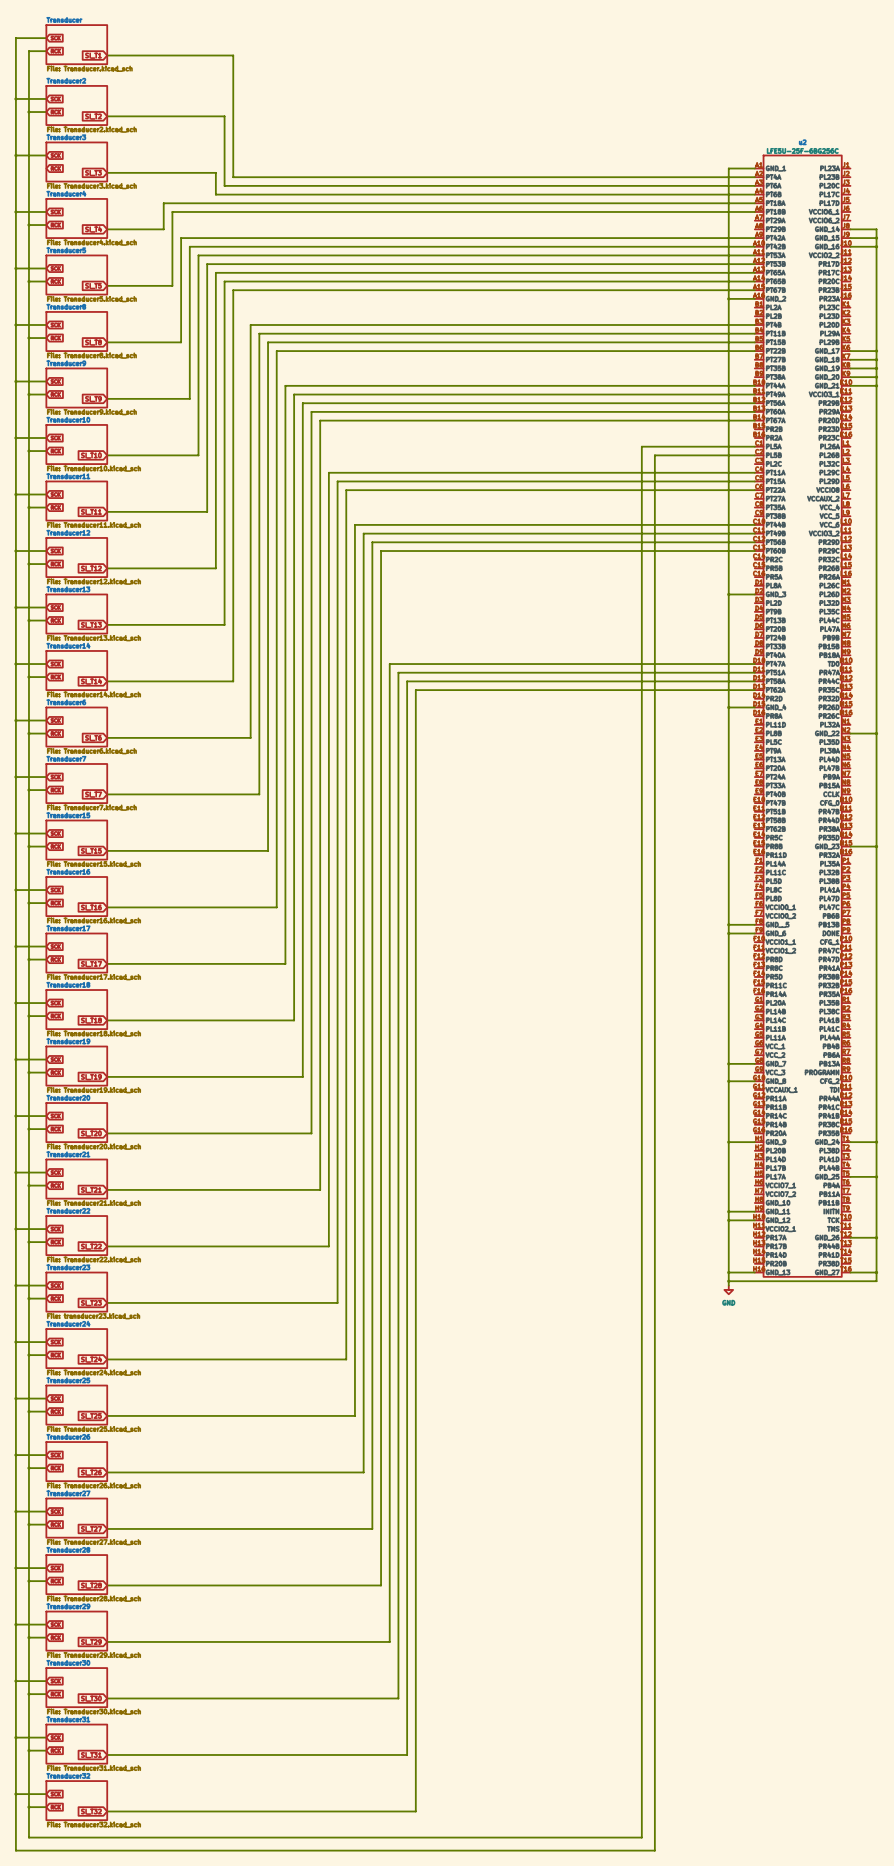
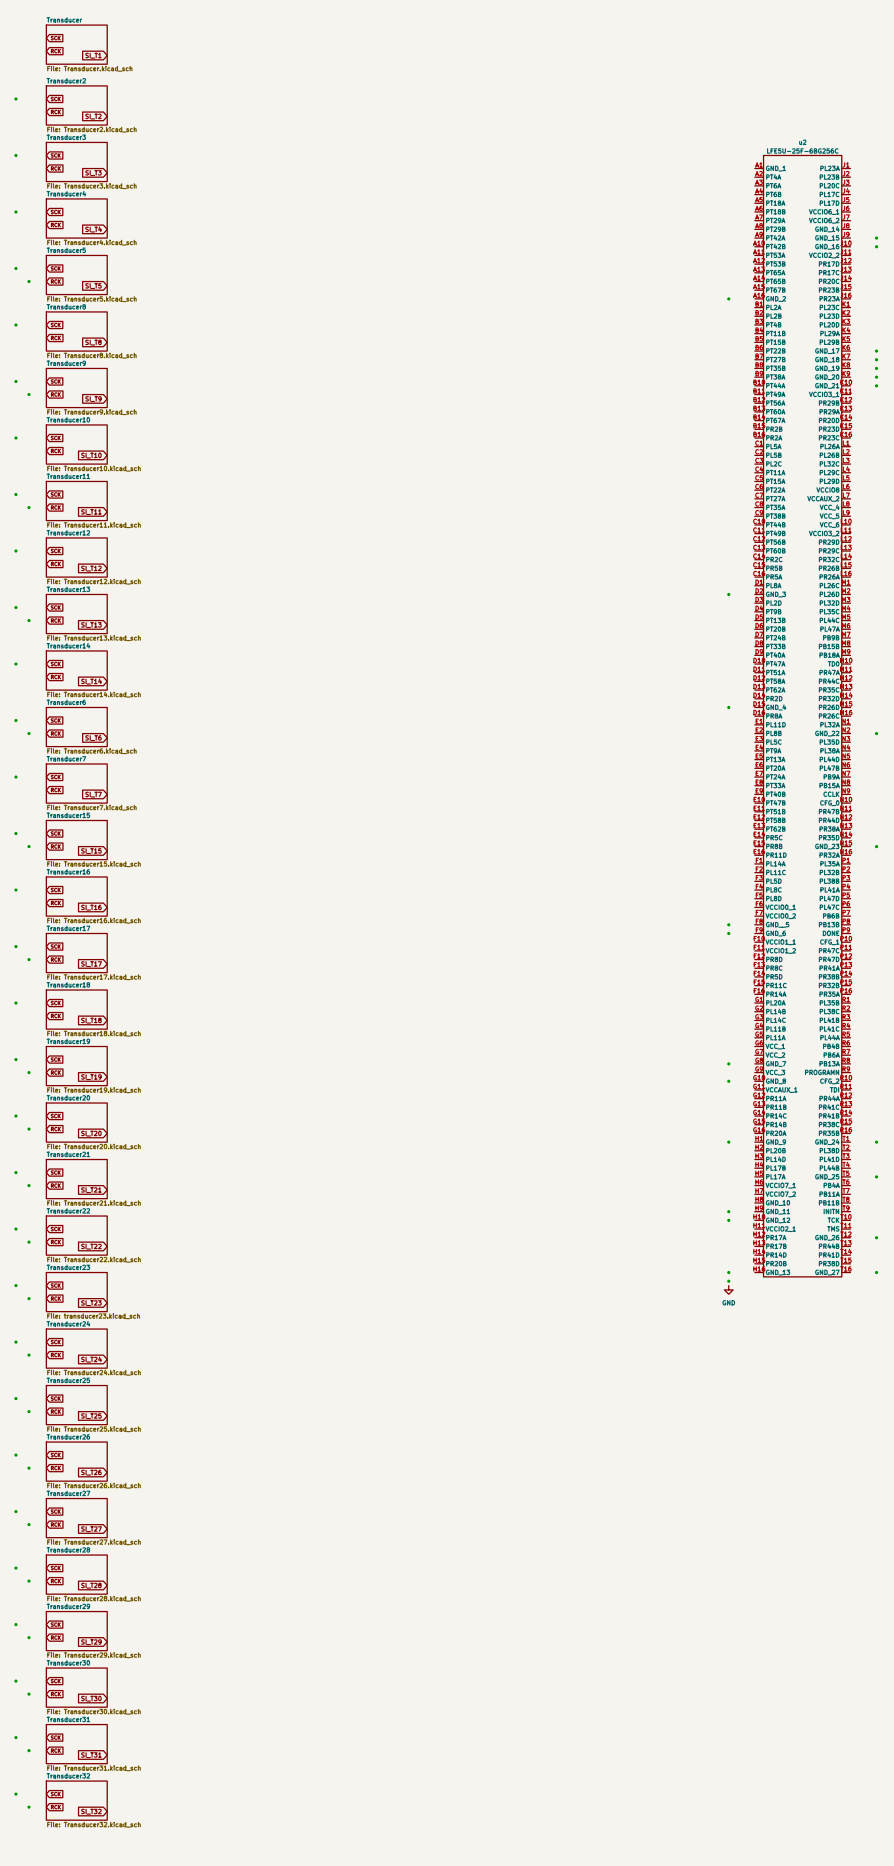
wire: (46, 38) (15, 38) (15, 1850) (654, 1850) (654, 455) (754, 455) -> none
wire: (46, 51) (28, 51) (28, 1837) (641, 1837) (641, 446) (754, 446) -> none
wire: (107, 55) (233, 55) (233, 177) (754, 177) -> none
wire: (15, 98) (46, 98) -> none
wire: (28, 112) (46, 112) -> none
wire: (107, 116) (224, 116) (224, 185) (754, 185) -> none
wire: (15, 155) (46, 155) -> none
wire: (754, 168) (728, 168) (728, 1285) -> none
wire: (107, 172) (215, 172) (215, 194) (754, 194) -> none
wire: (754, 203) (163, 203) (163, 229) (107, 229) -> none
wire: (15, 211) (46, 211) -> none
wire: (754, 211) (172, 211) (172, 285) (107, 285) -> none
wire: (28, 225) (46, 225) -> none
wire: (850, 229) (876, 229) (876, 1281) (728, 1281) -> none
wire: (754, 238) (181, 238) (181, 342) (107, 342) -> none
wire: (850, 238) (876, 238) -> none
wire: (754, 246) (189, 246) (189, 398) (107, 398) -> none
wire: (850, 246) (876, 246) -> none
wire: (754, 255) (198, 255) (198, 455) (107, 455) -> none
wire: (754, 264) (207, 264) (207, 511) (107, 511) -> none
wire: (15, 268) (46, 268) -> none
wire: (754, 272) (215, 272) (215, 568) (107, 568) -> none
wire: (28, 281) (46, 281) -> none
wire: (754, 281) (224, 281) (224, 624) (107, 624) -> none
wire: (754, 290) (233, 290) (233, 681) (107, 681) -> none
wire: (728, 298) (754, 298) -> none
wire: (15, 324) (46, 324) -> none
wire: (754, 324) (250, 324) (250, 737) (107, 737) -> none
wire: (754, 333) (259, 333) (259, 794) (107, 794) -> none
wire: (28, 338) (46, 338) -> none
wire: (754, 342) (268, 342) (268, 850) (107, 850) -> none
wire: (754, 351) (276, 351) (276, 907) (107, 907) -> none
wire: (850, 351) (876, 351) -> none
wire: (850, 359) (876, 359) -> none
wire: (850, 368) (876, 368) -> none
wire: (850, 377) (876, 377) -> none
wire: (15, 381) (46, 381) -> none
wire: (754, 385) (285, 385) (285, 963) (107, 963) -> none
wire: (850, 385) (876, 385) -> none
wire: (28, 394) (46, 394) -> none
wire: (754, 394) (294, 394) (294, 1020) (107, 1020) -> none
wire: (754, 403) (302, 403) (302, 1076) (107, 1076) -> none
wire: (754, 411) (311, 411) (311, 1133) (107, 1133) -> none
wire: (754, 420) (320, 420) (320, 1189) (107, 1189) -> none
wire: (15, 438) (46, 438) -> none
wire: (28, 451) (46, 451) -> none
wire: (754, 472) (328, 472) (328, 1246) (107, 1246) -> none
wire: (754, 481) (337, 481) (337, 1302) (107, 1302) -> none
wire: (754, 490) (346, 490) (346, 1359) (107, 1359) -> none
wire: (15, 494) (46, 494) -> none
wire: (28, 507) (46, 507) -> none
wire: (754, 524) (354, 524) (354, 1415) (107, 1415) -> none
wire: (754, 533) (363, 533) (363, 1472) (107, 1472) -> none
wire: (754, 542) (372, 542) (372, 1528) (107, 1528) -> none
wire: (15, 551) (46, 551) -> none
wire: (754, 551) (381, 551) (381, 1585) (107, 1585) -> none
wire: (28, 564) (46, 564) -> none
wire: (728, 594) (754, 594) -> none
wire: (15, 607) (46, 607) -> none
wire: (28, 620) (46, 620) -> none
wire: (15, 664) (46, 664) -> none
wire: (754, 664) (389, 664) (389, 1641) (107, 1641) -> none
wire: (754, 672) (398, 672) (398, 1698) (107, 1698) -> none
wire: (28, 677) (46, 677) -> none
wire: (754, 681) (407, 681) (407, 1754) (107, 1754) -> none
wire: (754, 690) (415, 690) (415, 1811) (107, 1811) -> none
wire: (728, 707) (754, 707) -> none
wire: (15, 720) (46, 720) -> none
wire: (28, 733) (46, 733) -> none
wire: (850, 733) (876, 733) -> none
wire: (15, 777) (46, 777) -> none
wire: (28, 790) (46, 790) -> none
wire: (15, 833) (46, 833) -> none
wire: (28, 846) (46, 846) -> none
wire: (850, 846) (876, 846) -> none
wire: (15, 890) (46, 890) -> none
wire: (28, 903) (46, 903) -> none
wire: (728, 924) (754, 924) -> none
wire: (728, 933) (754, 933) -> none
wire: (15, 946) (46, 946) -> none
wire: (28, 959) (46, 959) -> none
wire: (15, 1003) (46, 1003) -> none
wire: (28, 1016) (46, 1016) -> none
wire: (15, 1059) (46, 1059) -> none
wire: (728, 1063) (754, 1063) -> none
wire: (28, 1072) (46, 1072) -> none
wire: (728, 1081) (754, 1081) -> none
wire: (15, 1116) (46, 1116) -> none
wire: (28, 1129) (46, 1129) -> none
wire: (728, 1142) (754, 1142) -> none
wire: (850, 1142) (876, 1142) -> none
wire: (15, 1172) (46, 1172) -> none
wire: (850, 1176) (876, 1176) -> none
wire: (28, 1185) (46, 1185) -> none
wire: (728, 1211) (754, 1211) -> none
wire: (728, 1220) (754, 1220) -> none
wire: (15, 1229) (46, 1229) -> none
wire: (850, 1237) (876, 1237) -> none
wire: (28, 1242) (46, 1242) -> none
wire: (728, 1272) (754, 1272) -> none
wire: (850, 1272) (876, 1272) -> none
wire: (15, 1285) (46, 1285) -> none
wire: (28, 1298) (46, 1298) -> none
wire: (15, 1342) (46, 1342) -> none
wire: (28, 1355) (46, 1355) -> none
wire: (15, 1398) (46, 1398) -> none
wire: (28, 1411) (46, 1411) -> none
wire: (15, 1455) (46, 1455) -> none
wire: (28, 1468) (46, 1468) -> none
wire: (15, 1511) (46, 1511) -> none
wire: (28, 1524) (46, 1524) -> none
wire: (15, 1568) (46, 1568) -> none
wire: (28, 1581) (46, 1581) -> none
wire: (15, 1624) (46, 1624) -> none
wire: (28, 1637) (46, 1637) -> none
wire: (15, 1681) (46, 1681) -> none
wire: (28, 1694) (46, 1694) -> none
wire: (15, 1737) (46, 1737) -> none
wire: (28, 1750) (46, 1750) -> none
wire: (15, 1794) (46, 1794) -> none
wire: (28, 1807) (46, 1807) -> none

